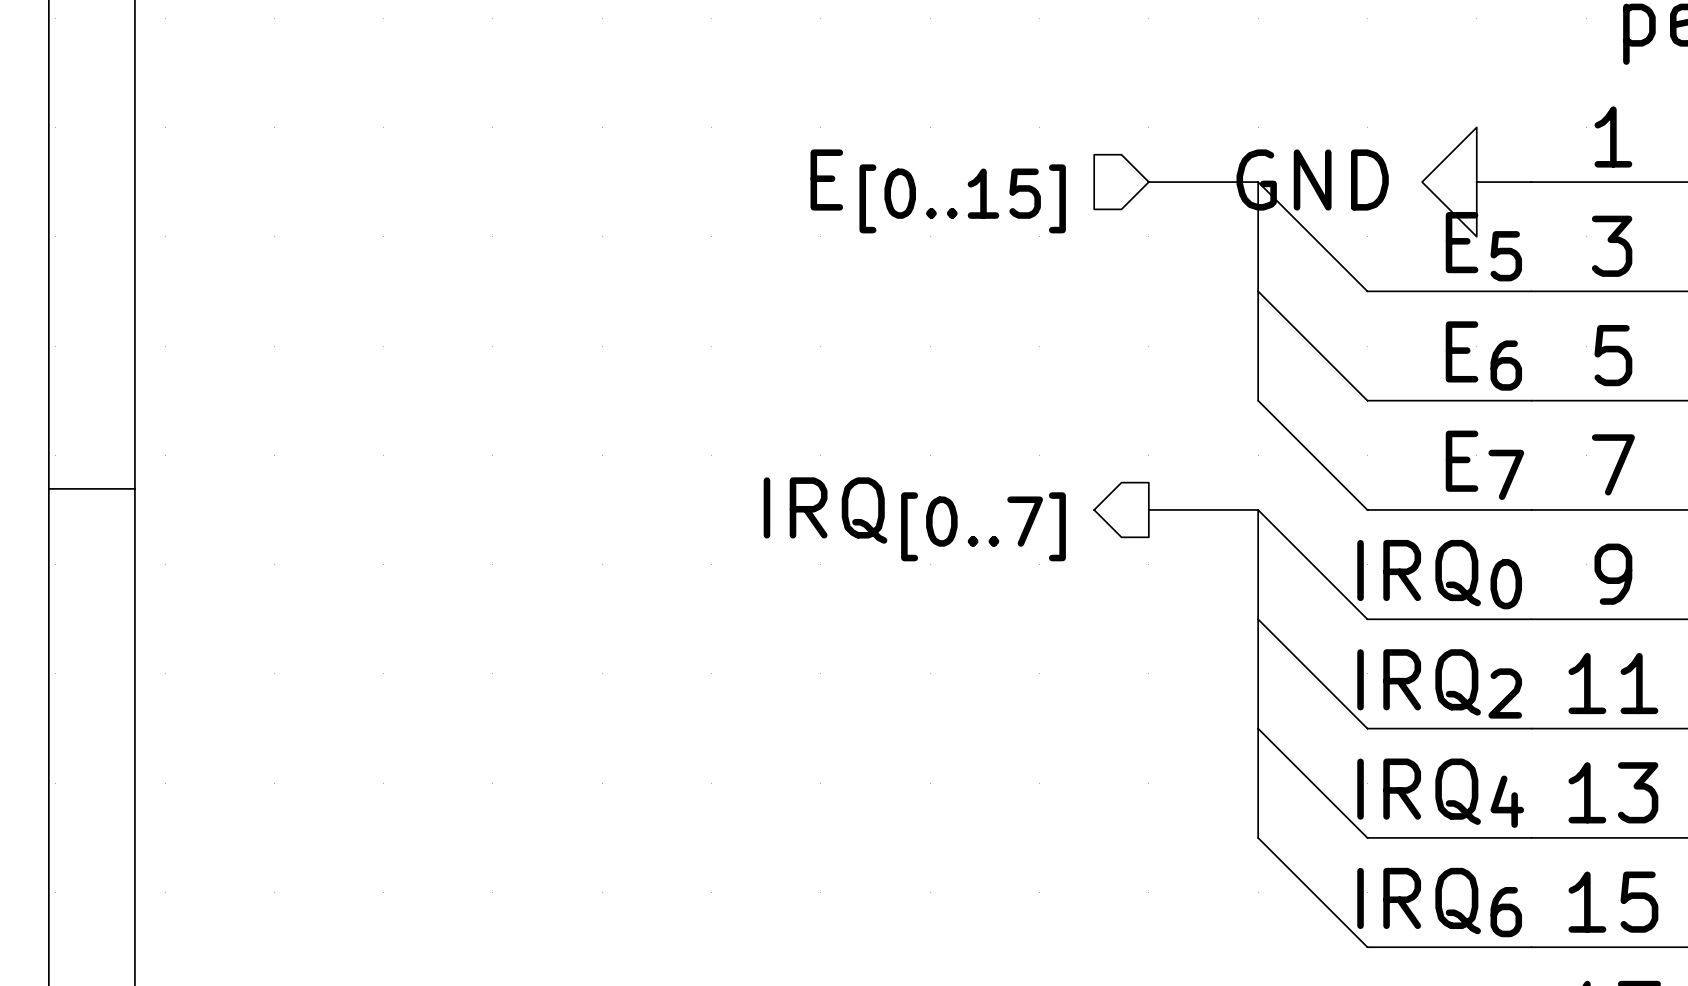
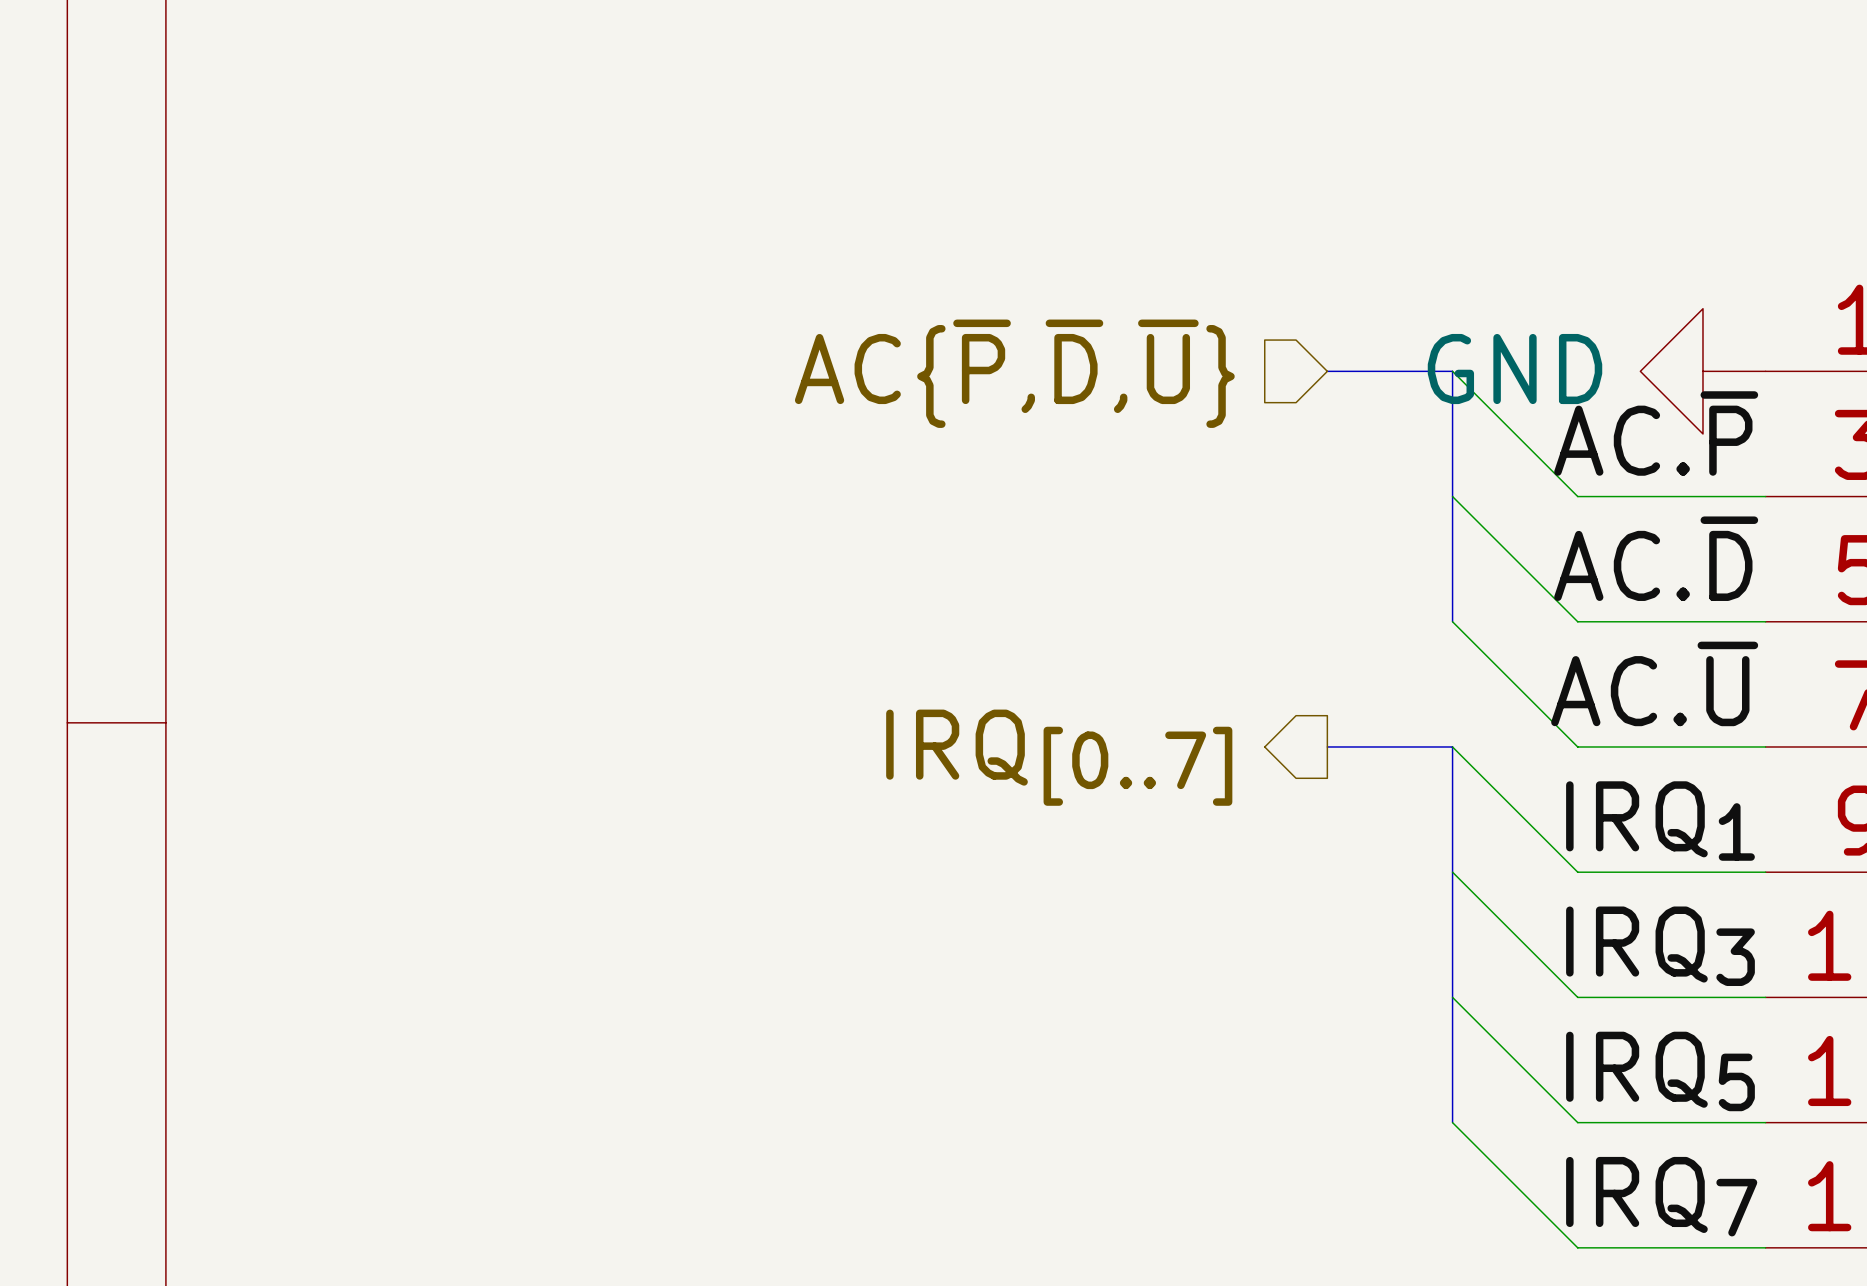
hierarchical label: E[0..15] (938, 191) -> AC{~{P},~{D},~{U}} (1014, 373)
label: E5 (1483, 246) -> AC.~{P} (1656, 433)
label: E6 (1483, 355) -> AC.~{D} (1656, 558)
label: E7 (1484, 465) -> AC.~{U} (1654, 683)
label: IRQ0 (1439, 574) -> IRQ1 (1660, 821)
label: IRQ2 (1439, 683) -> IRQ3 (1660, 946)
label: IRQ4 (1440, 793) -> IRQ5 (1660, 1071)
label: IRQ6 (1439, 902) -> IRQ7 (1661, 1196)

